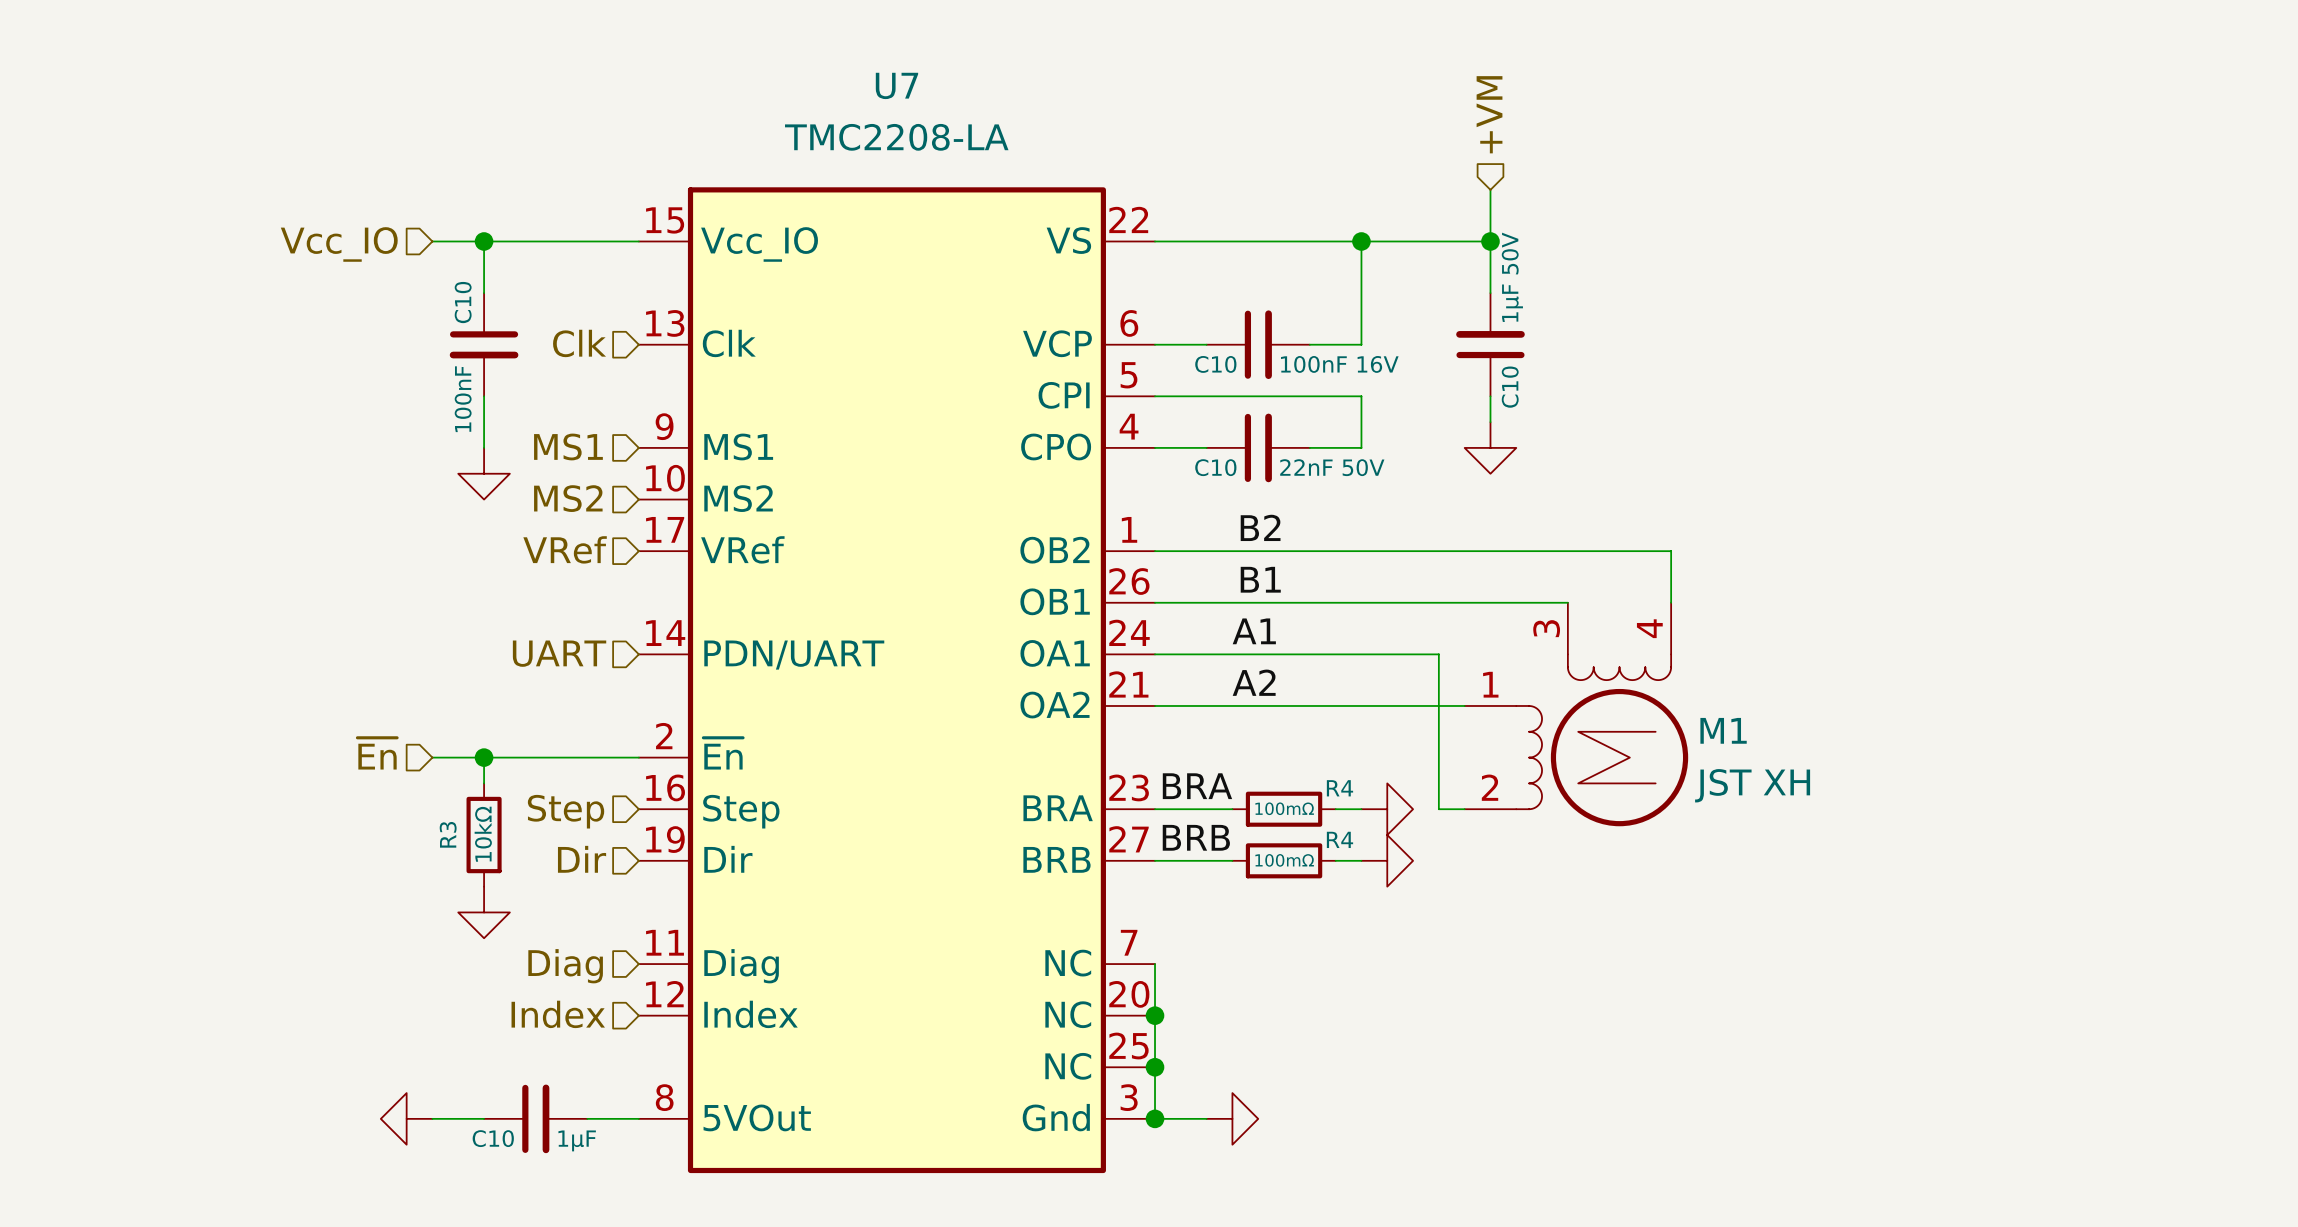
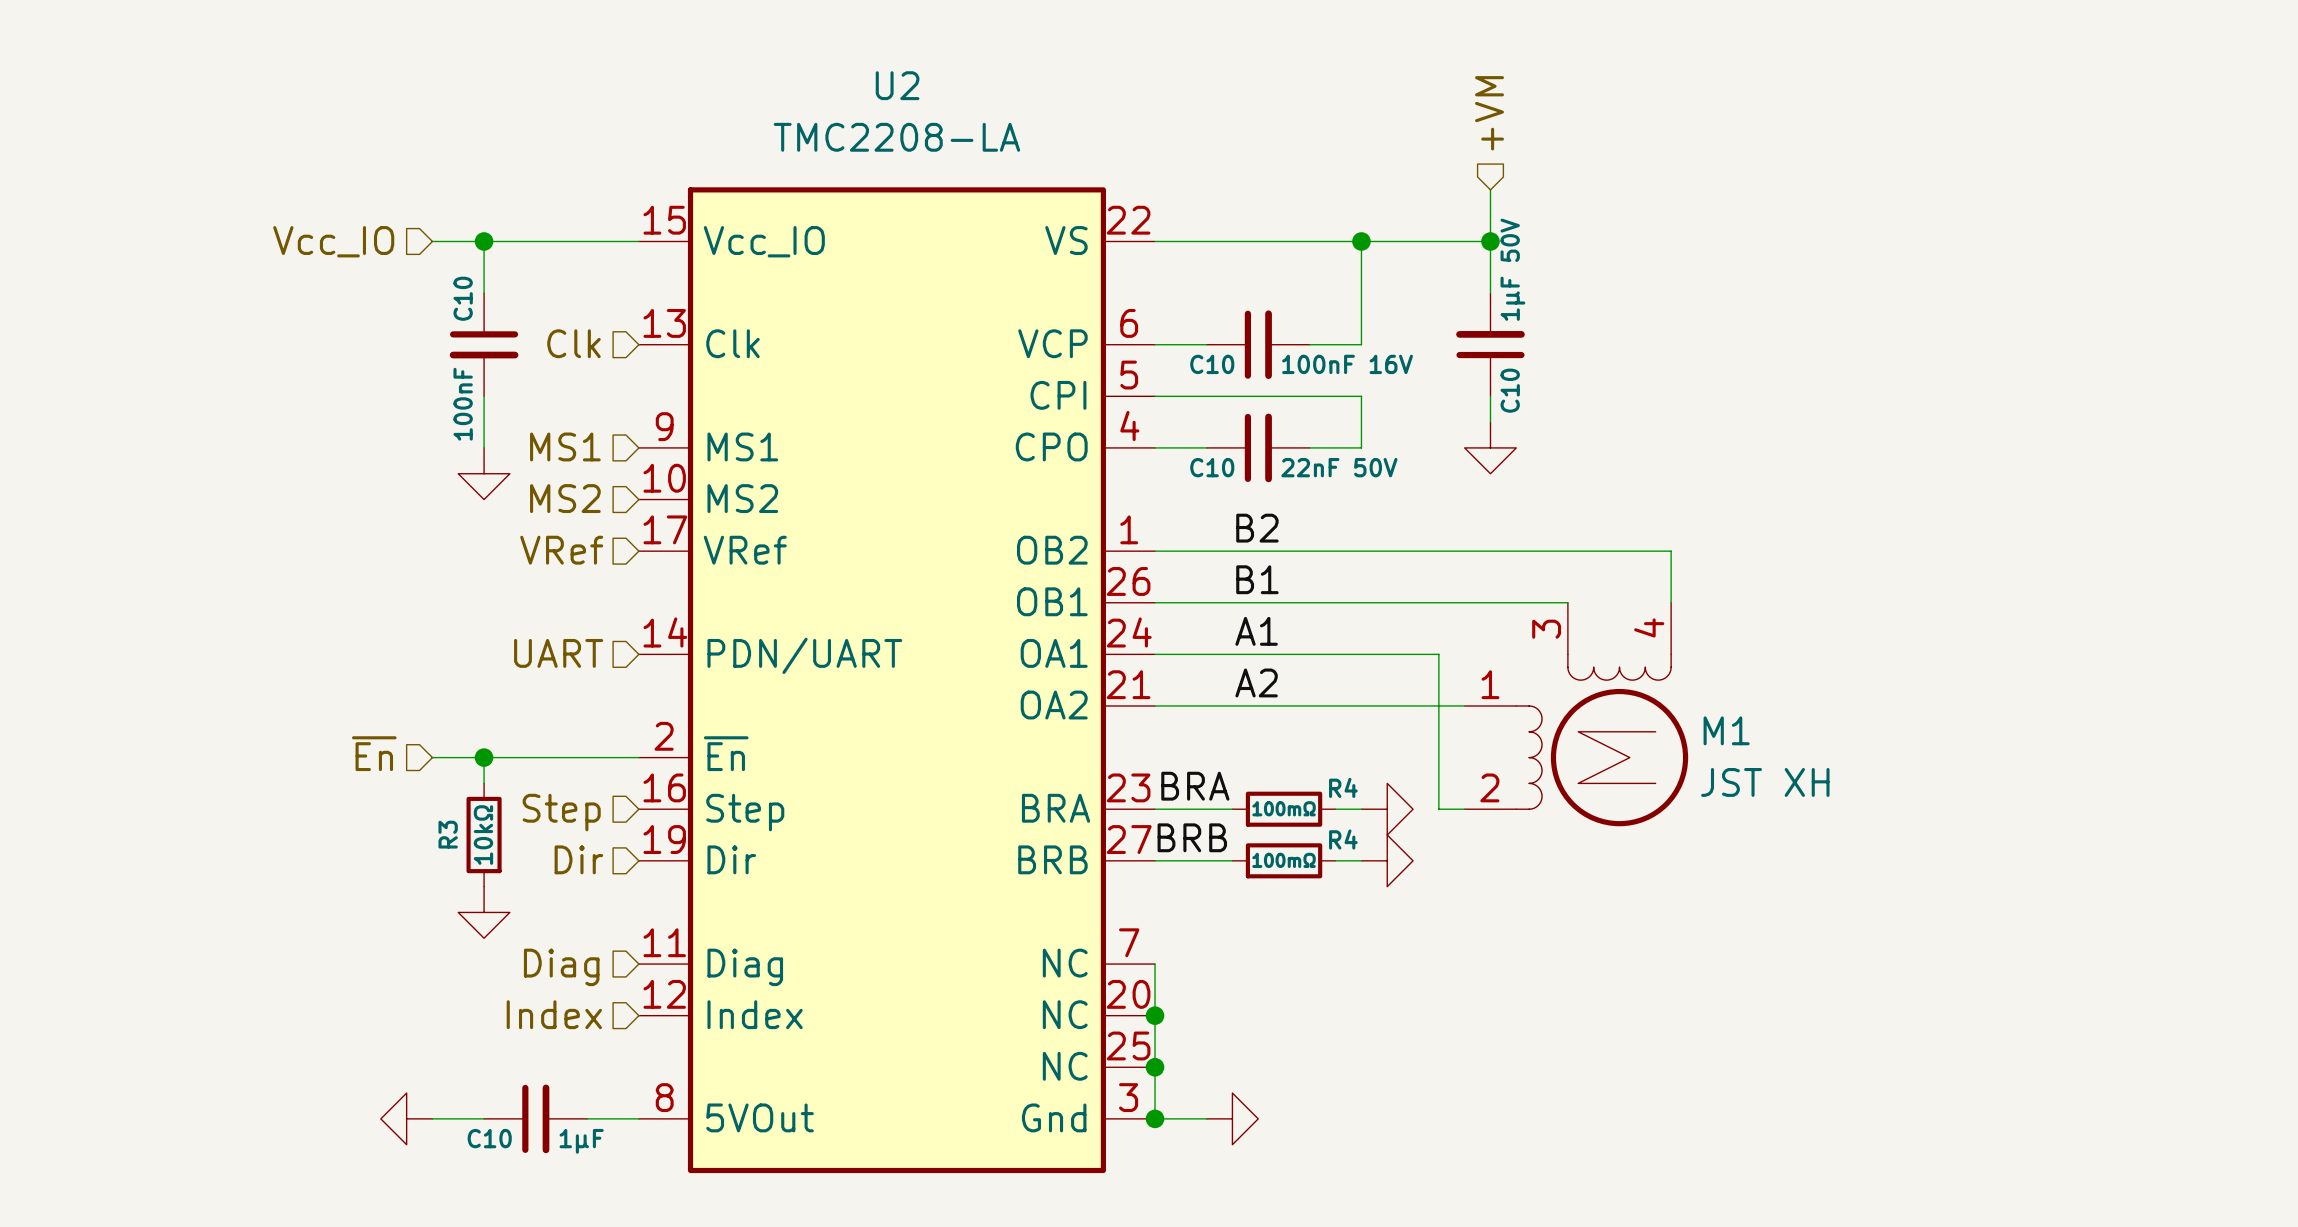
U7 name: U7 (896, 85) -> U2 (897, 85)

